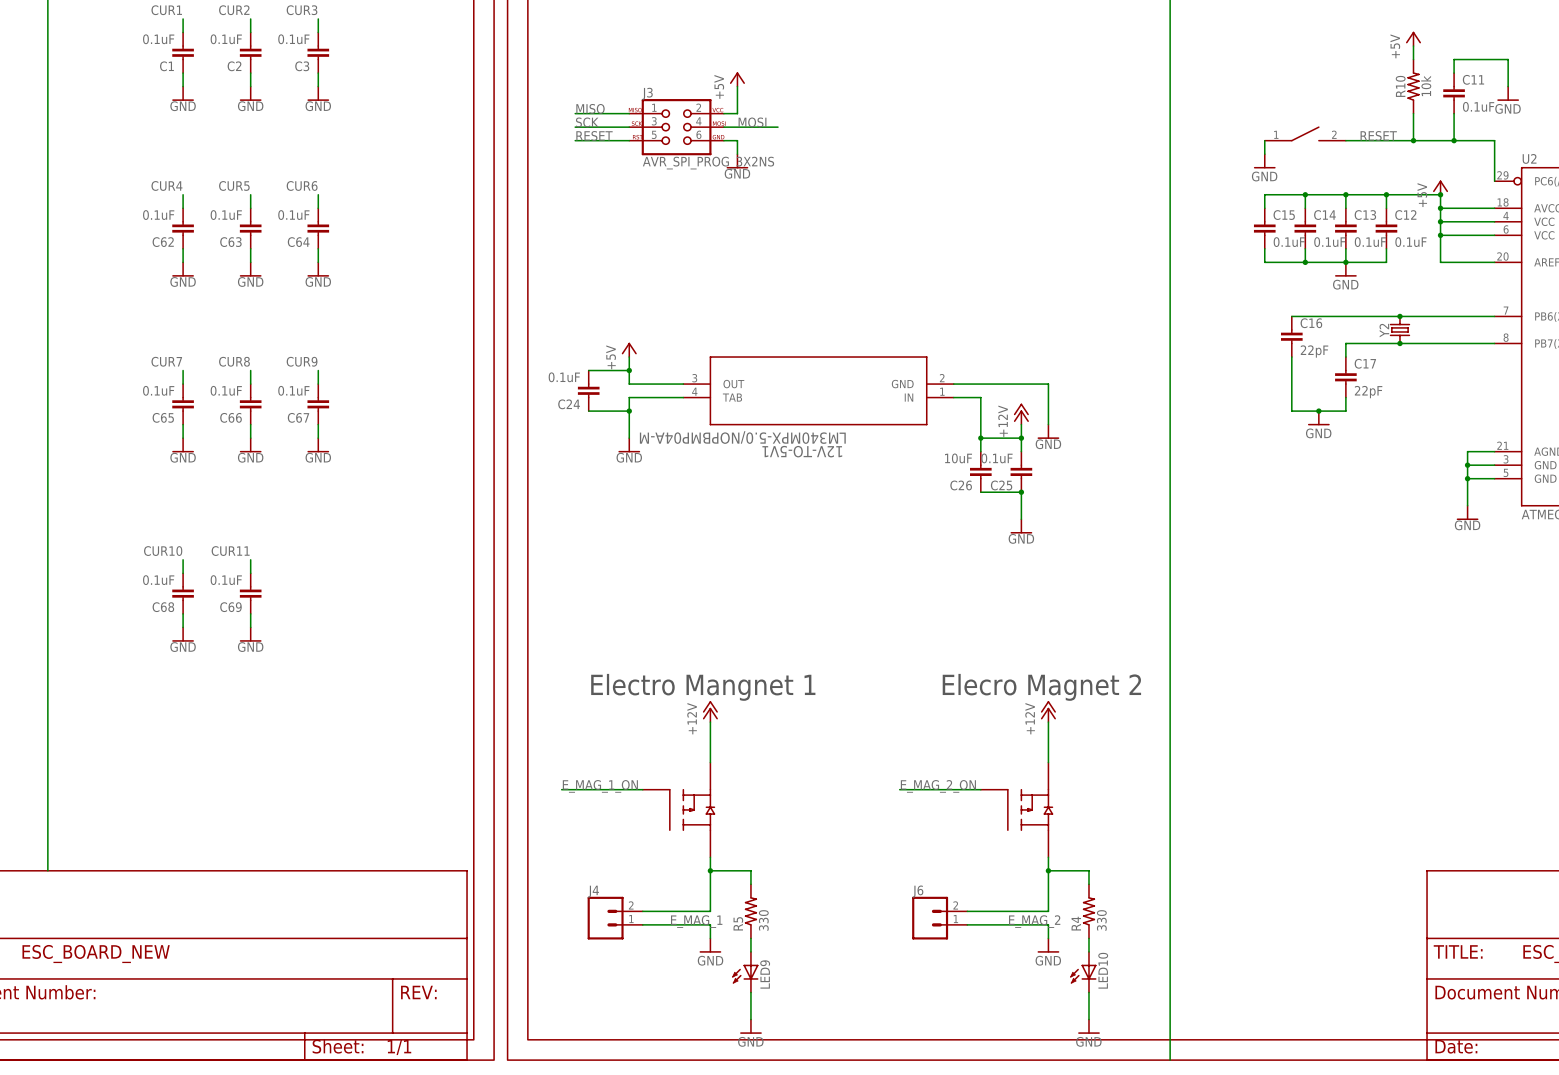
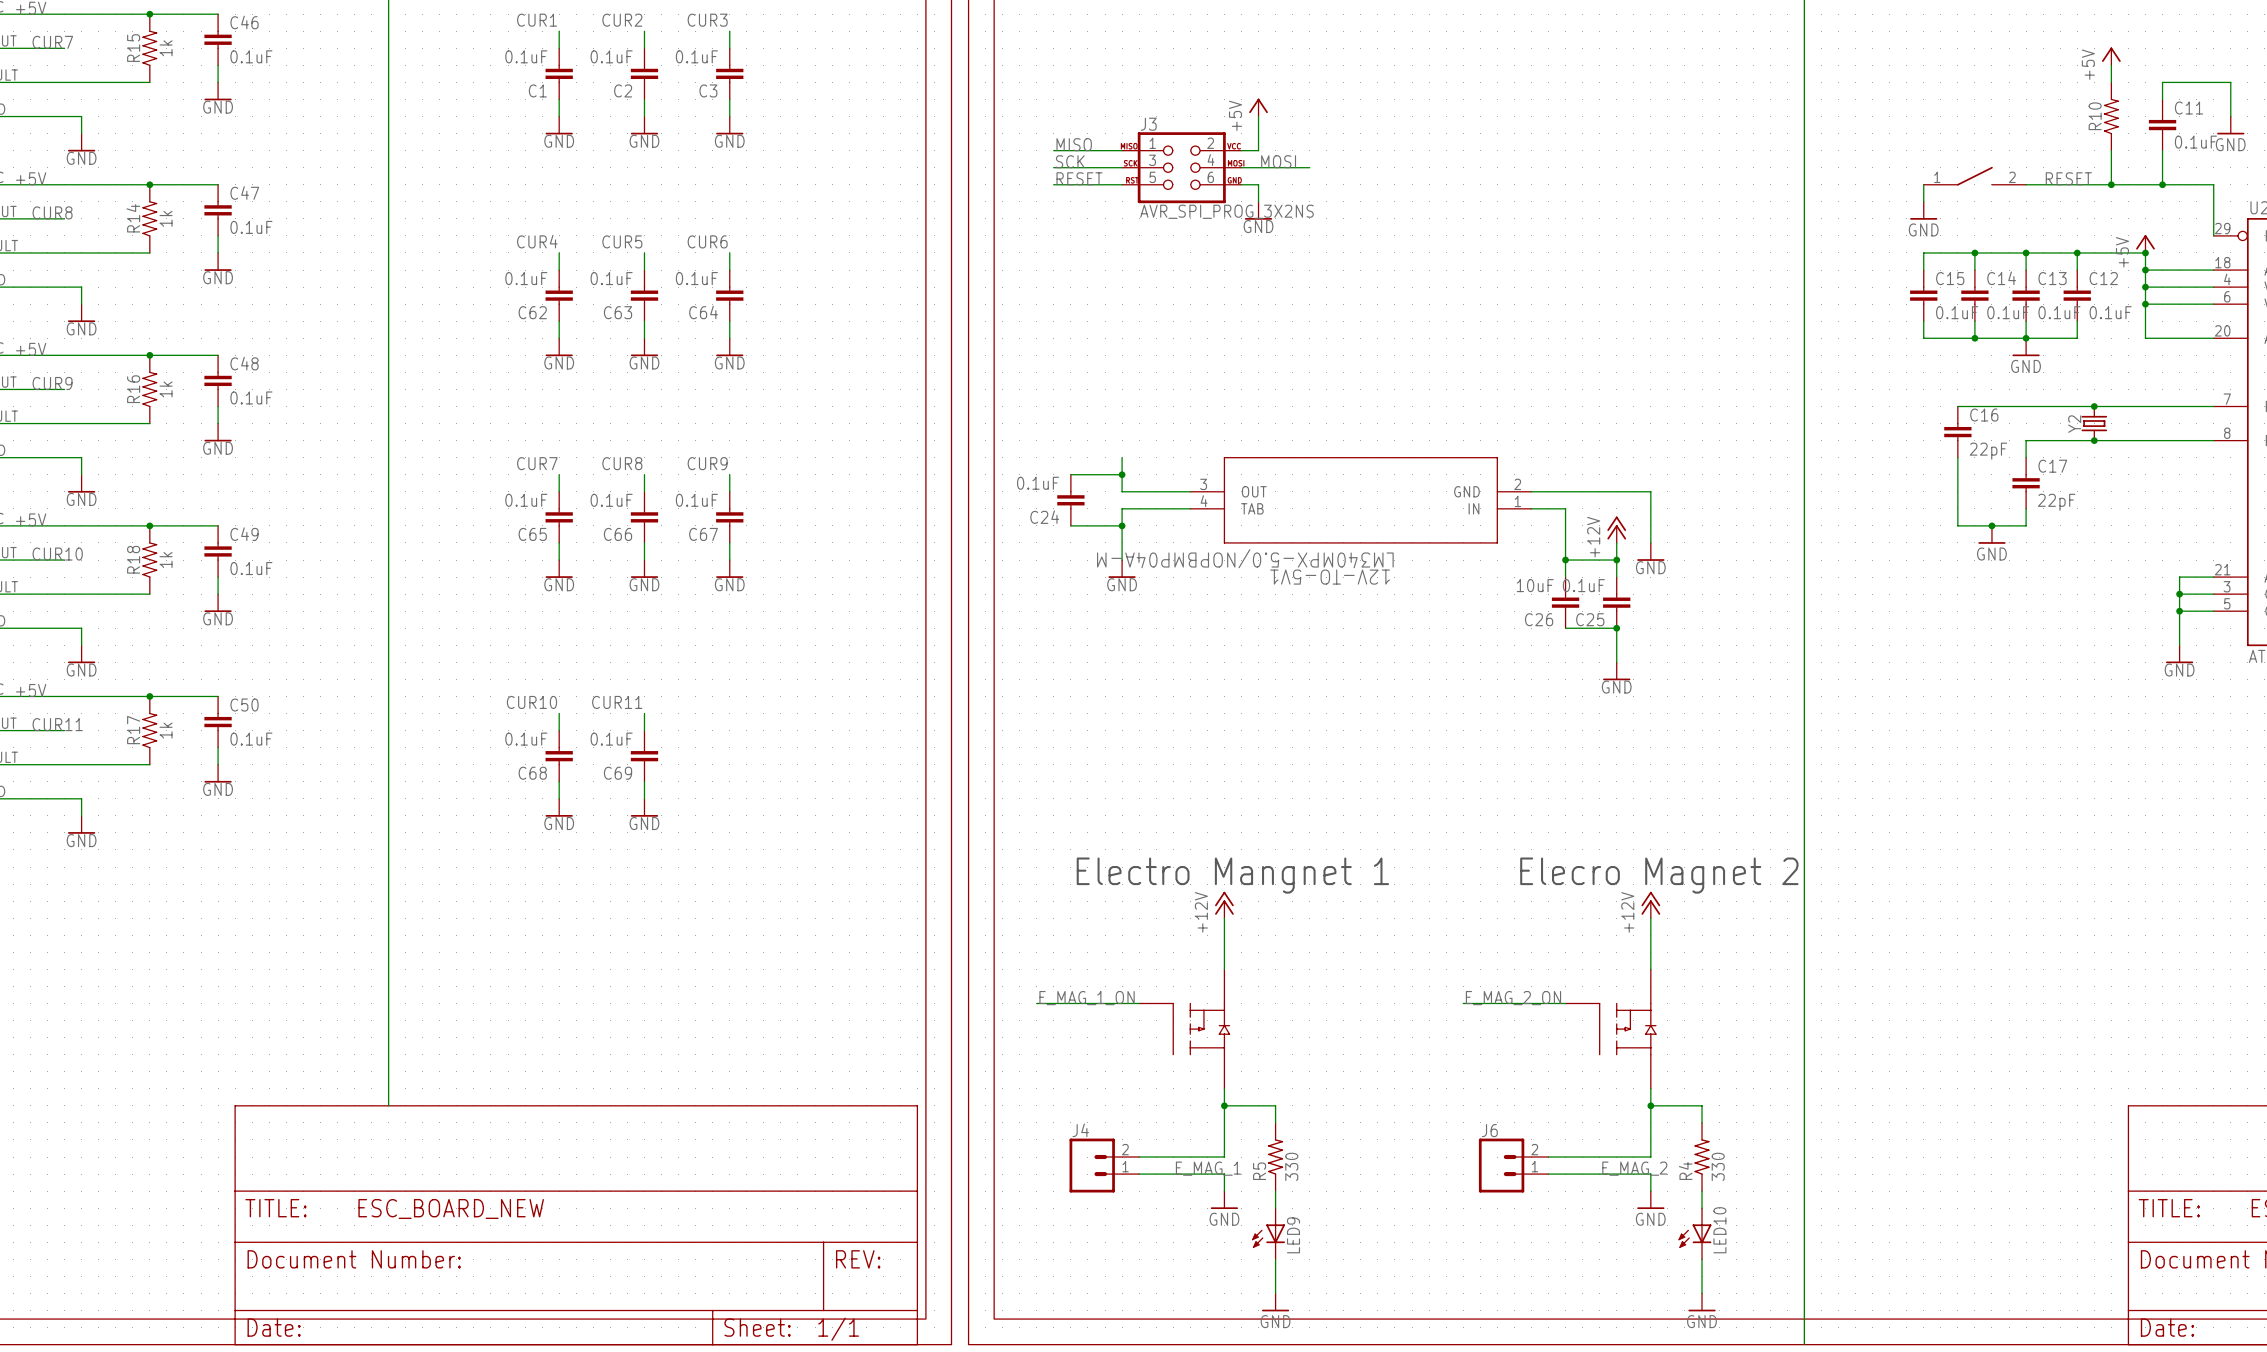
R10 value: 10k (1426, 85) -> none
power symbol: +5V (629, 349) -> none

